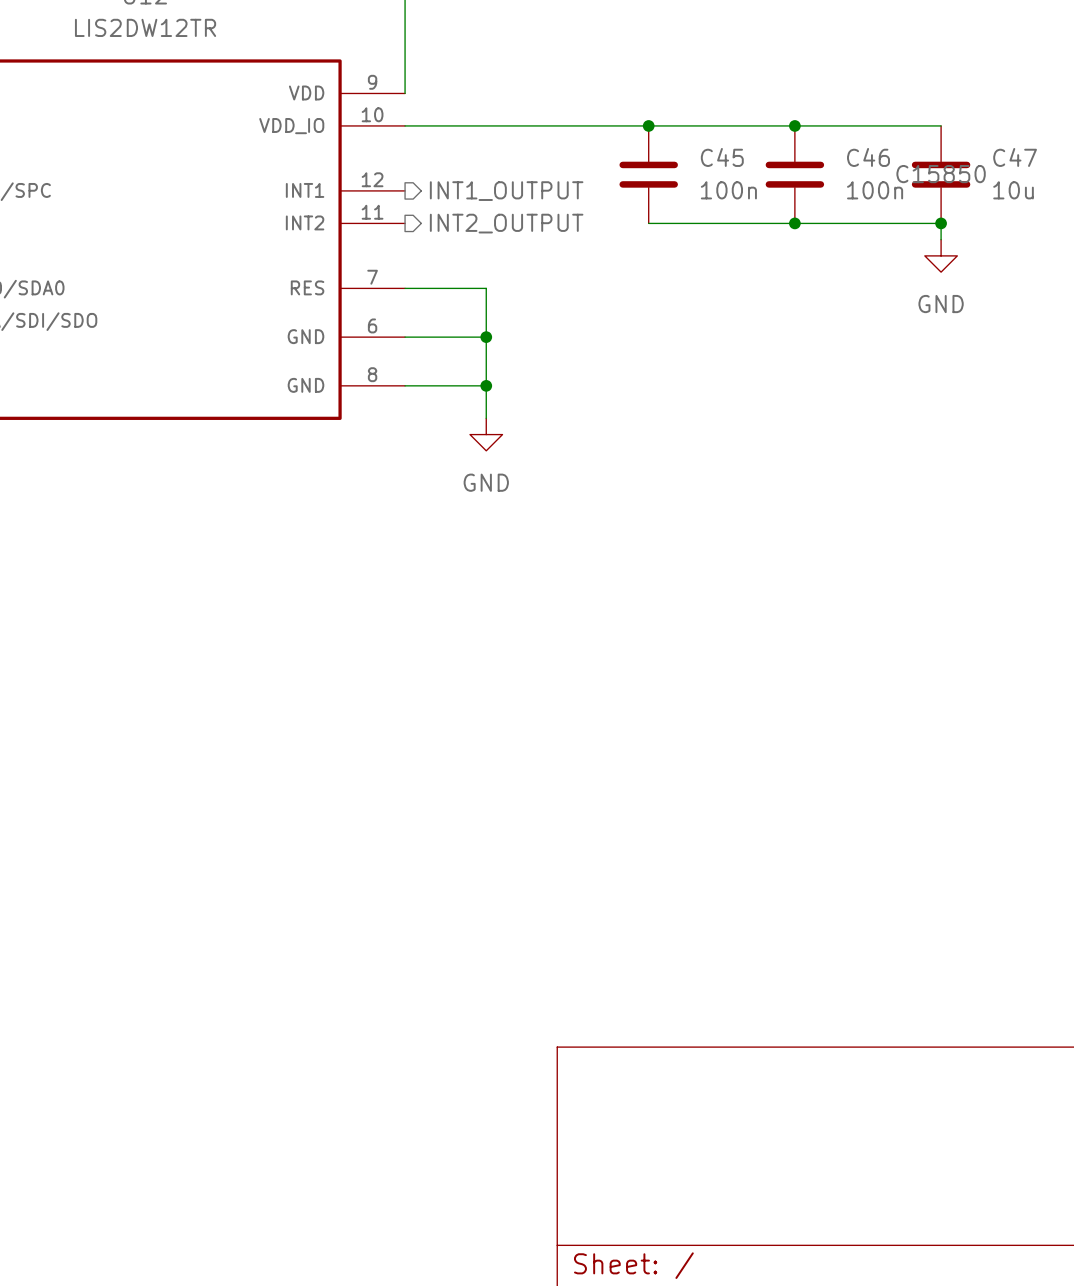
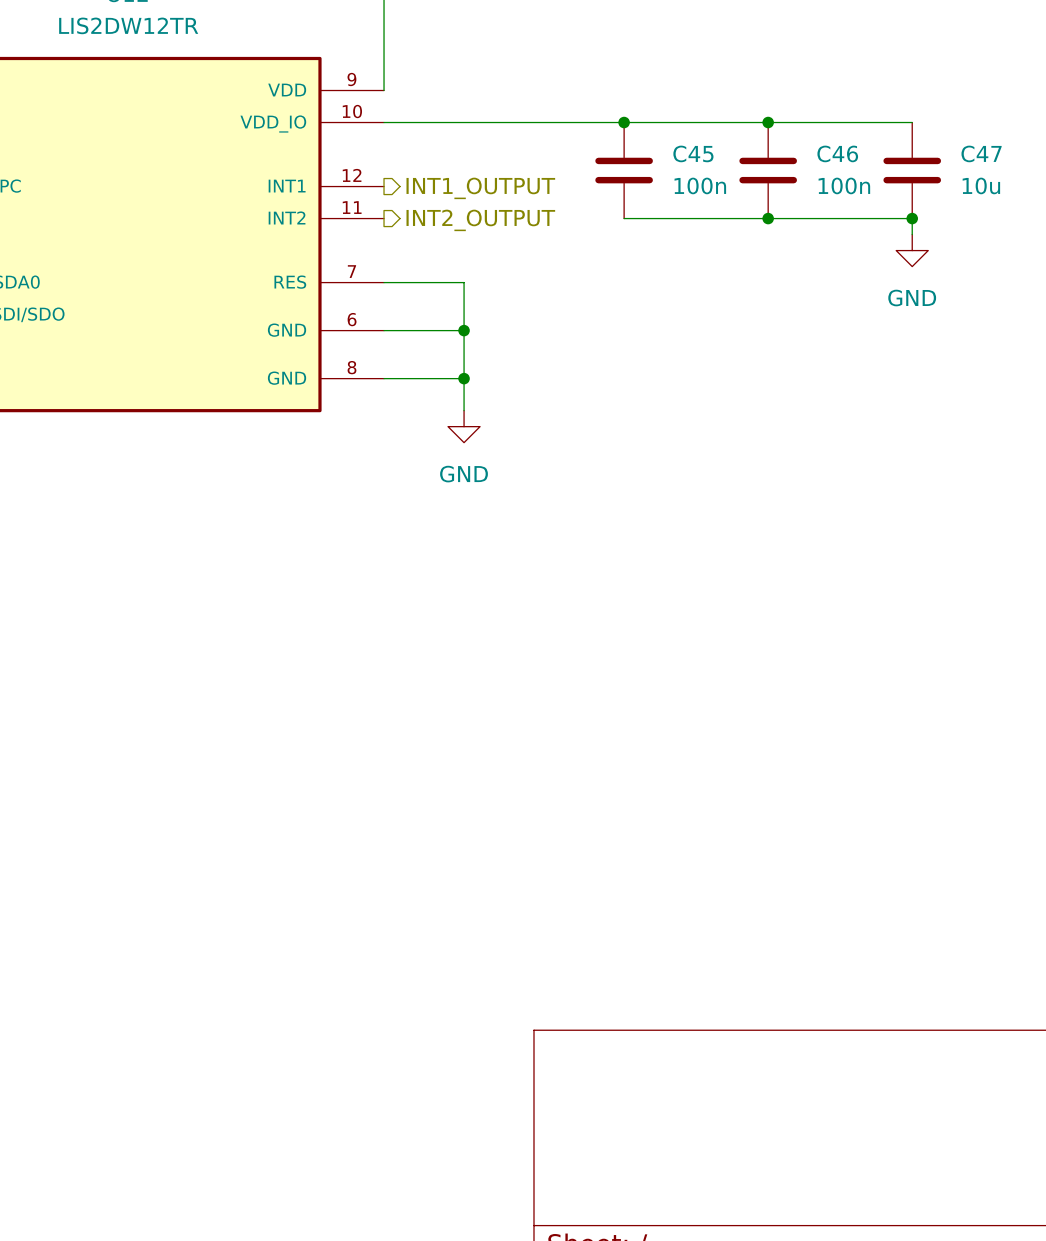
C47 text: C15850 (941, 174) -> none

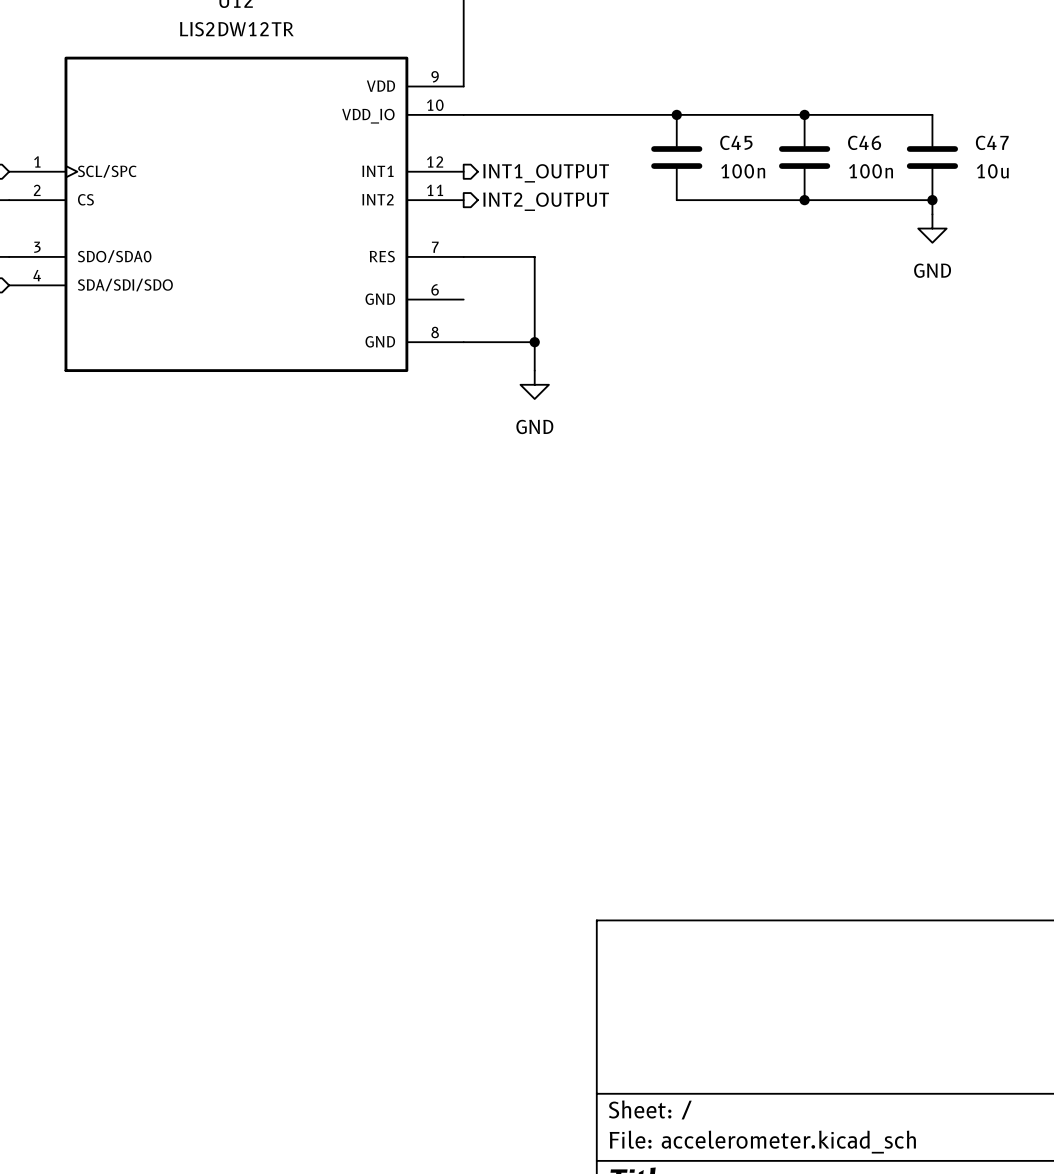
wire: (384, 330) (464, 330) -> none
junction: (464, 330) -> none

